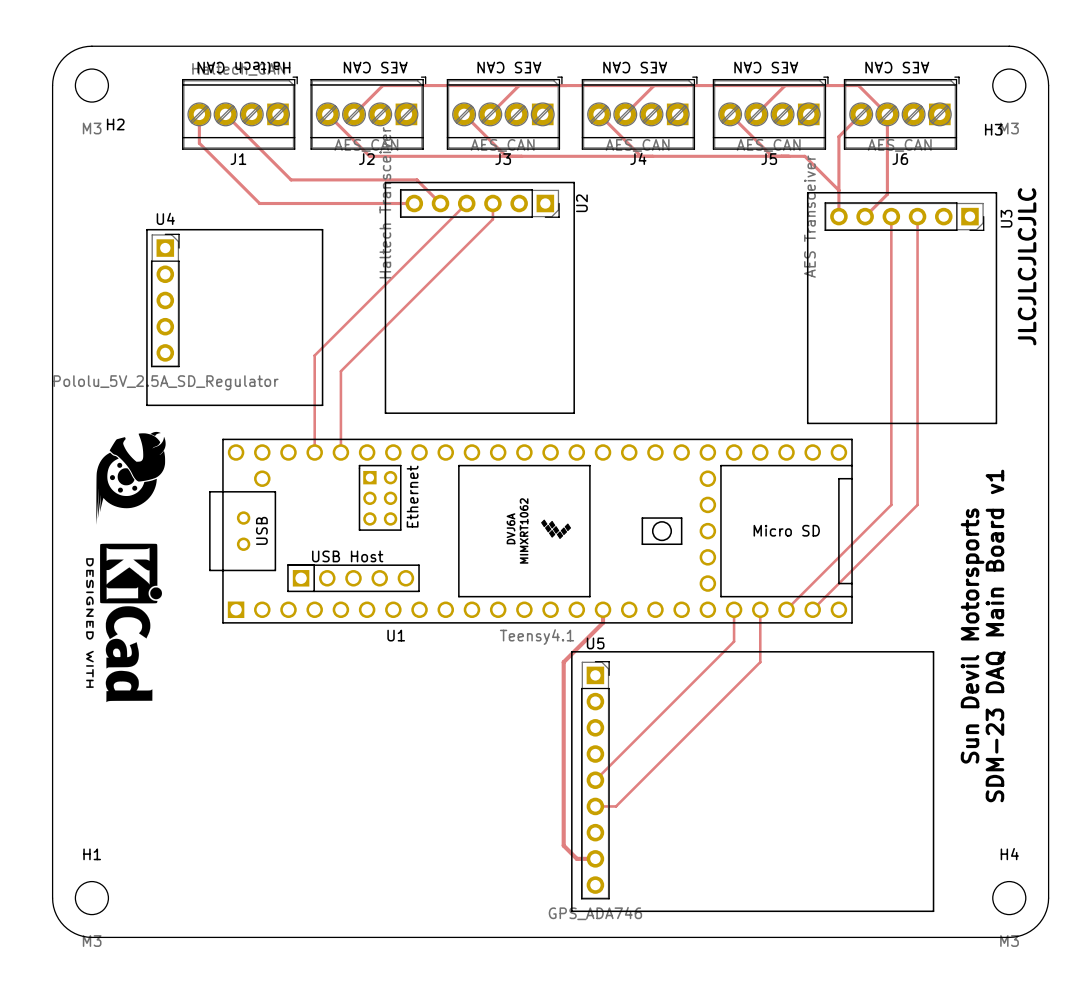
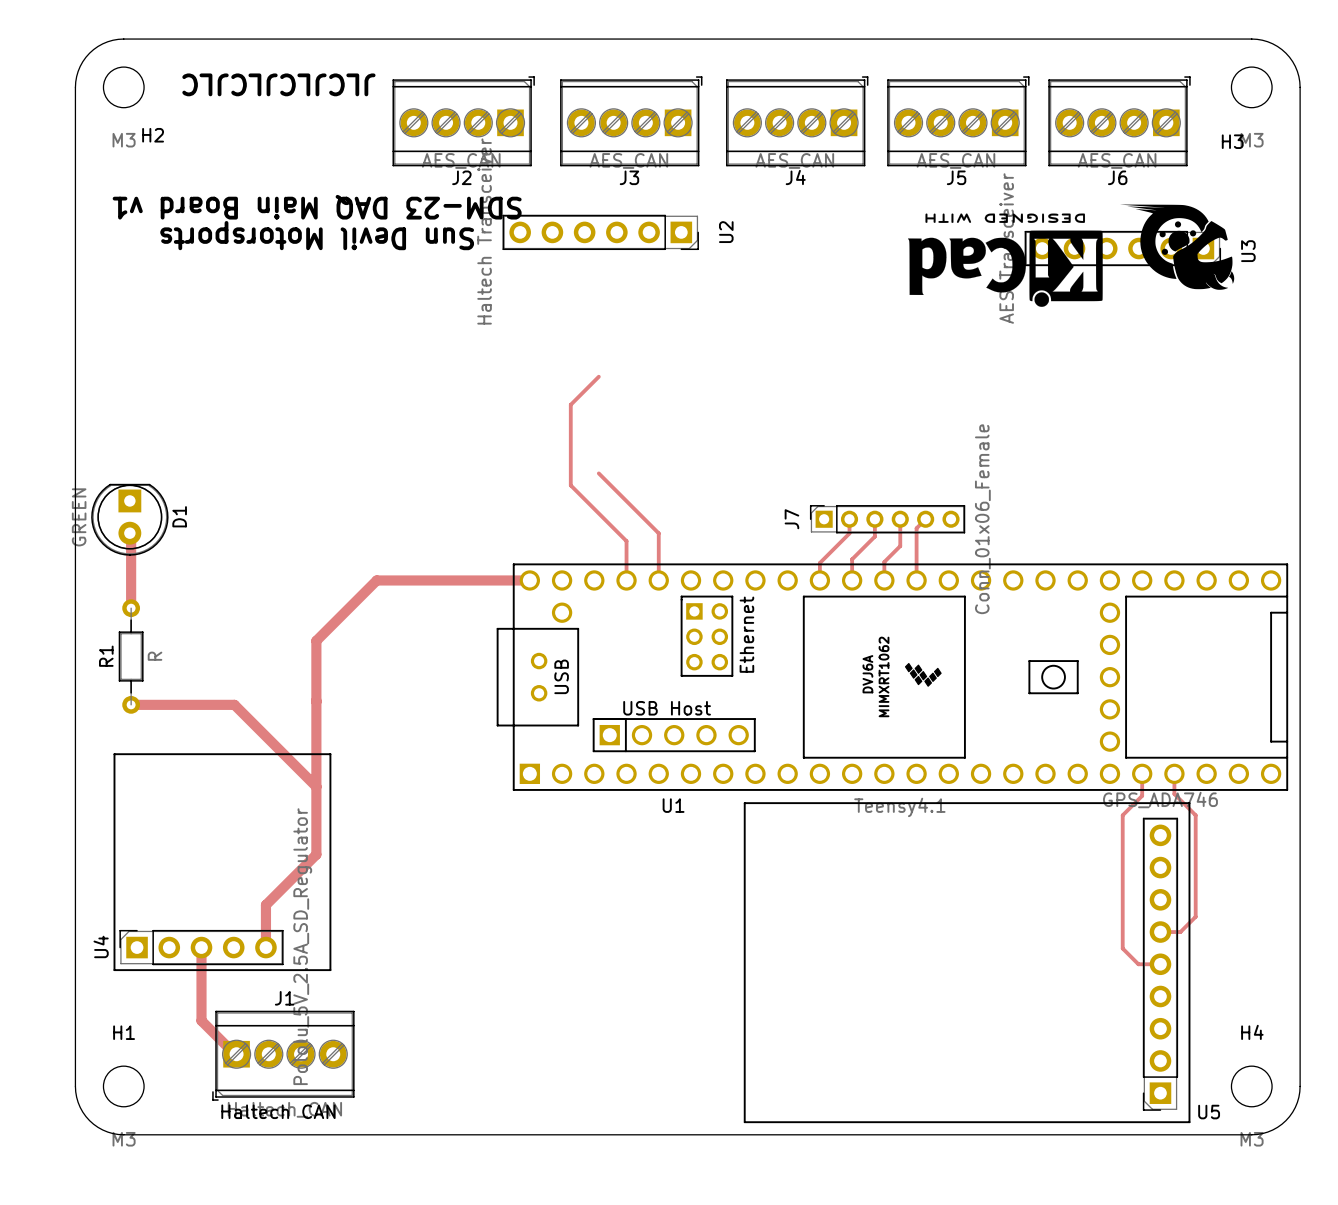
text: Haltech CAN (243, 67) -> none
text: AES CAN (375, 67) -> none
text: AES CAN (509, 67) -> none
text: AES CAN (635, 67) -> none
text: AES CAN (766, 67) -> none
text: AES CAN (897, 67) -> none
text: none -> JLCJLCJLCJLC (278, 84)
track: (519, 85) (490, 114) -> none
track: (654, 85) (625, 114) -> none
track: (785, 85) (756, 114) -> none
J1 rotation: 0° (239, 113) -> 180° (283, 1055)
J1 position: (239, 113) -> (283, 1055)
track: (199, 114) (199, 143) (259, 203) (414, 203) -> none
track: (225, 114) (291, 179) (416, 179) (440, 203) -> none
track: (327, 114) (369, 156) (804, 156) (838, 190) -> none
track: (354, 114) (382, 85) (858, 85) (887, 114) (887, 194) (865, 216) -> none
track: (464, 114) (506, 156) -> none
track: (599, 114) (641, 156) -> none
track: (730, 114) (772, 156) -> none
track: (861, 114) (838, 136) (838, 216) -> none
drawing: none -> [1120, 204, 1235, 290]
line: (385, 182) (574, 182) (574, 413) (385, 413) (385, 182) -> none
text: none -> SDM-23 DAQ Main Board v1 (317, 207)
drawing: none -> [907, 213, 1103, 307]
line: (807, 192) (996, 192) (996, 423) (807, 423) (807, 192) -> none
track: (466, 203) (314, 355) (314, 452) -> none
track: (492, 203) (492, 219) (340, 371) (340, 452) -> none
text: none -> Sun Devil Motorsports (317, 235)
track: (891, 216) (891, 504) (786, 609) -> none
track: (917, 216) (917, 504) (812, 609) -> none
line: (146, 229) (322, 229) (322, 405) (146, 405) (146, 229) -> none
text: JLCJLCJLCJLC (1027, 266) -> none
U4 rotation: 0° (165, 300) -> 90° counterclockwise (201, 947)
U4 position: (165, 300) -> (201, 947)
track: none -> (598, 376) (570, 404) (570, 485) (626, 541) (626, 580)
track: none -> (598, 473) (658, 533) (658, 580)
drawing: [96, 431, 166, 525] -> none
track: none -> (849, 519) (849, 533) (819, 563) (819, 580)
track: none -> (874, 519) (874, 536) (852, 559) (852, 580)
J7: none -> Conn_01x06_Female (887, 519)
track: none -> (900, 519) (900, 546) (884, 562) (884, 580)
track: none -> (925, 519) (916, 528) (916, 580)
D1: none -> GREEN (129, 519)
track: none -> (129, 533) (131, 608)
track: none -> (529, 580) (376, 580) (316, 640) (316, 854) (265, 905) (265, 947)
U1 text: Micro SD (786, 530) -> none
U1 position: (530, 531) -> (892, 677)
drawing: [86, 543, 163, 703] -> none
R1: none -> R (131, 656)
track: none -> (131, 704) (234, 704) (316, 786)
track: (603, 609) (603, 622) (563, 662) (563, 845) (576, 858) (595, 858) -> none
track: (734, 609) (734, 641) (595, 780) -> none
track: (760, 609) (760, 662) (616, 806) (595, 806) -> none
line: none -> (114, 754) (330, 754) (330, 970) (114, 970) (114, 754)
U1 name position: U1 (396, 635) -> U1 (673, 805)
text: Sun Devil Motorsports (972, 635) -> none
text: SDM-23 DAQ Main Board v1 (995, 635) -> none
U5 name position: U5 (595, 643) -> U5 (1209, 1112)
track: none -> (1142, 773) (1142, 795) (1122, 815) (1122, 948) (1138, 964) (1160, 964)
track: none -> (1174, 773) (1174, 794) (1195, 815) (1195, 916) (1180, 932) (1160, 932)
line: (571, 651) (933, 651) (933, 911) (571, 911) (571, 651) -> (744, 803) (1189, 803) (1189, 1122) (744, 1122) (744, 803)
U5 rotation: 0° (595, 780) -> 180° (1160, 964)
U5 position: (595, 780) -> (1160, 964)
track: none -> (201, 947) (201, 1020) (236, 1054)
text: none -> Haltech CAN (278, 1111)

